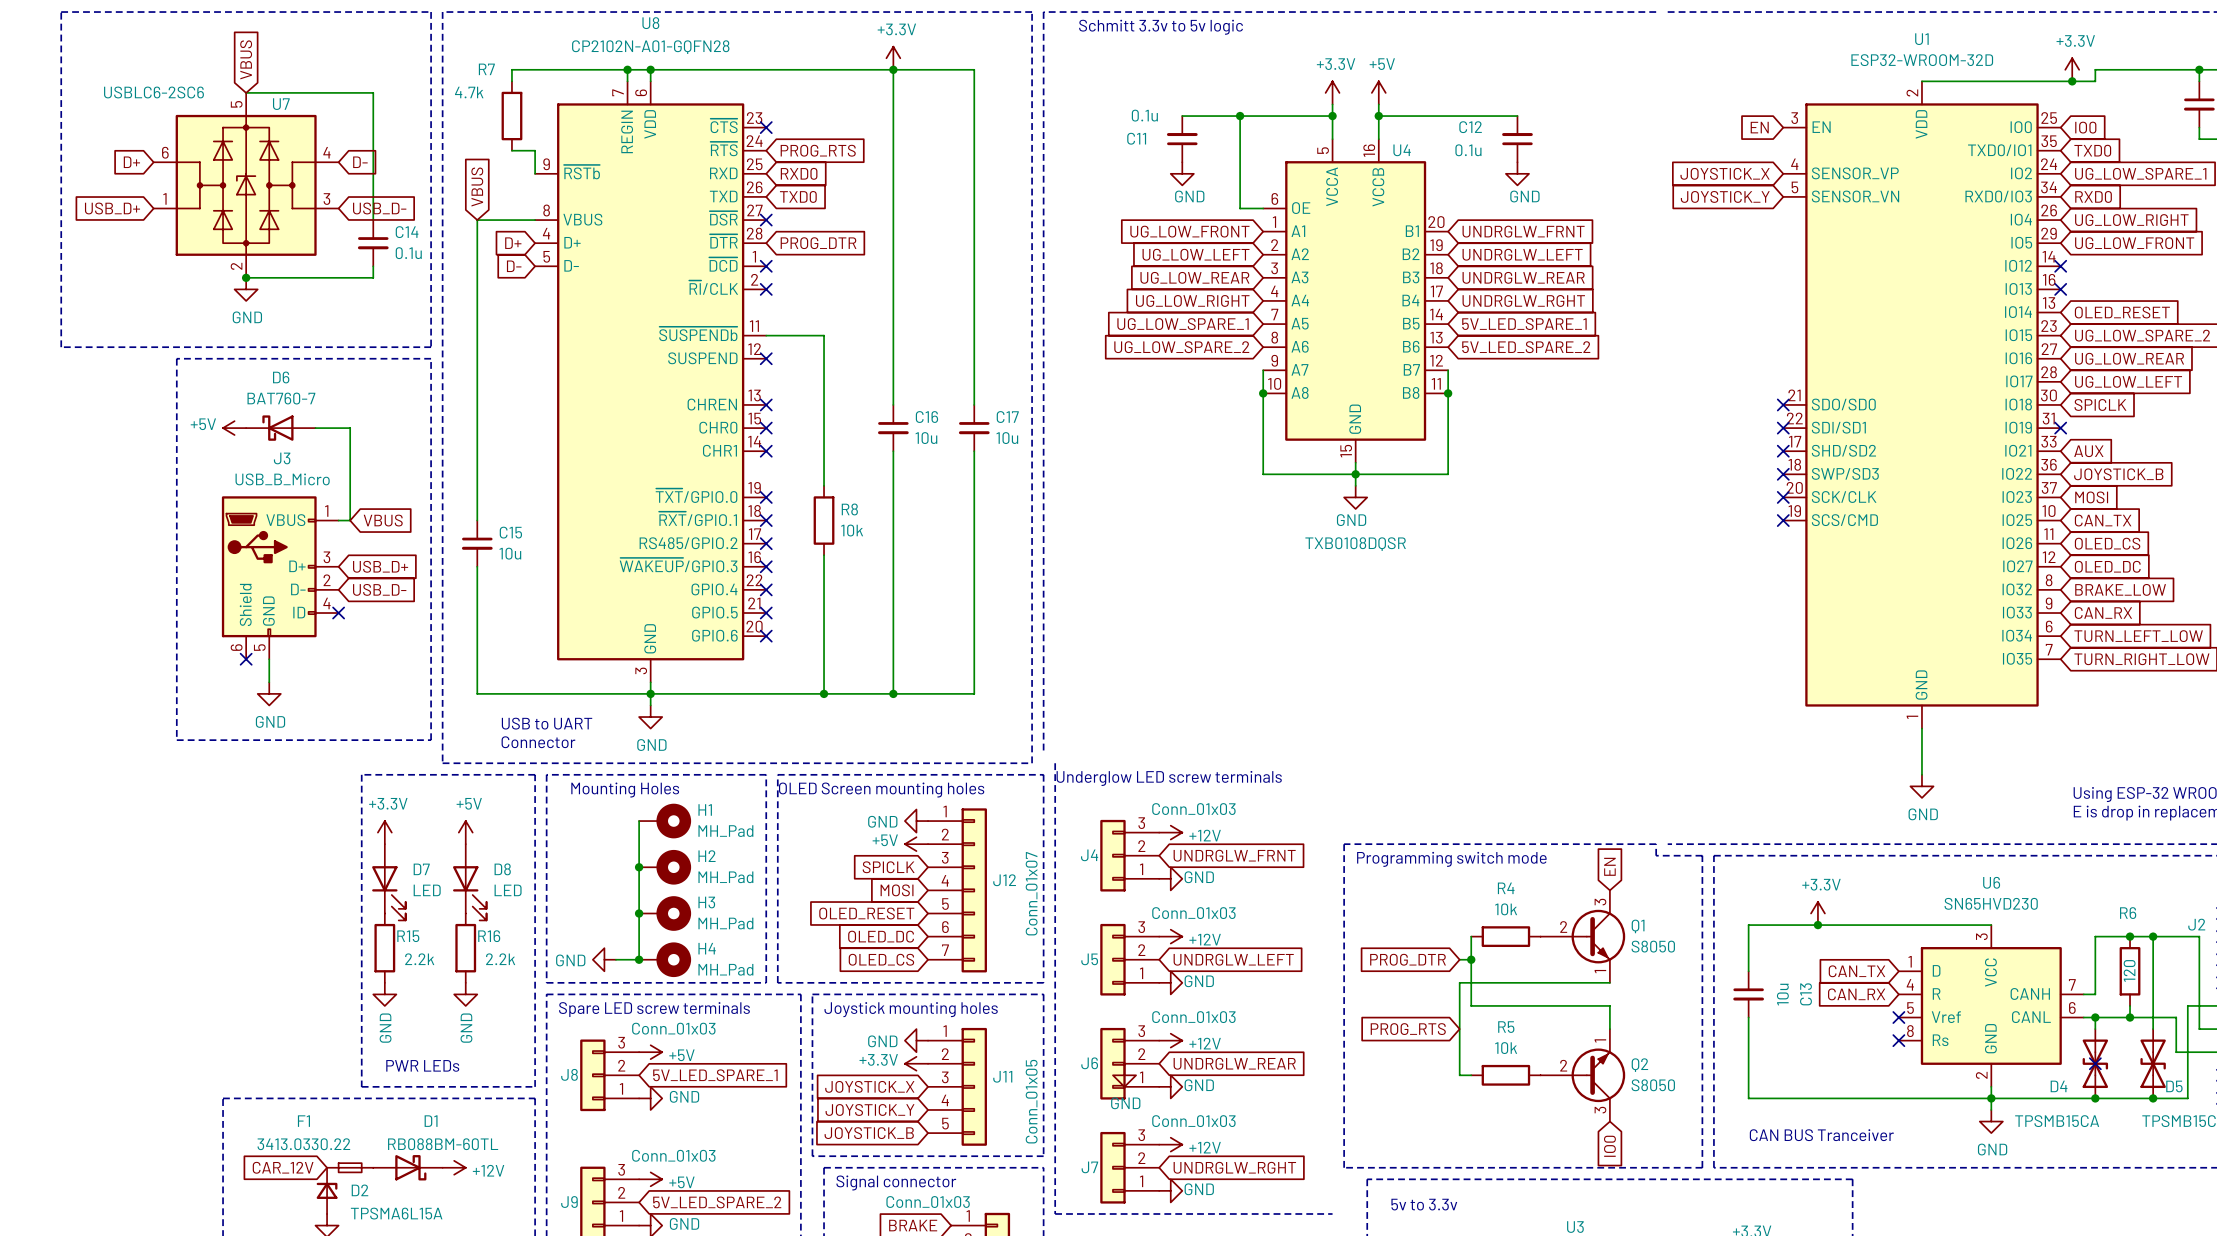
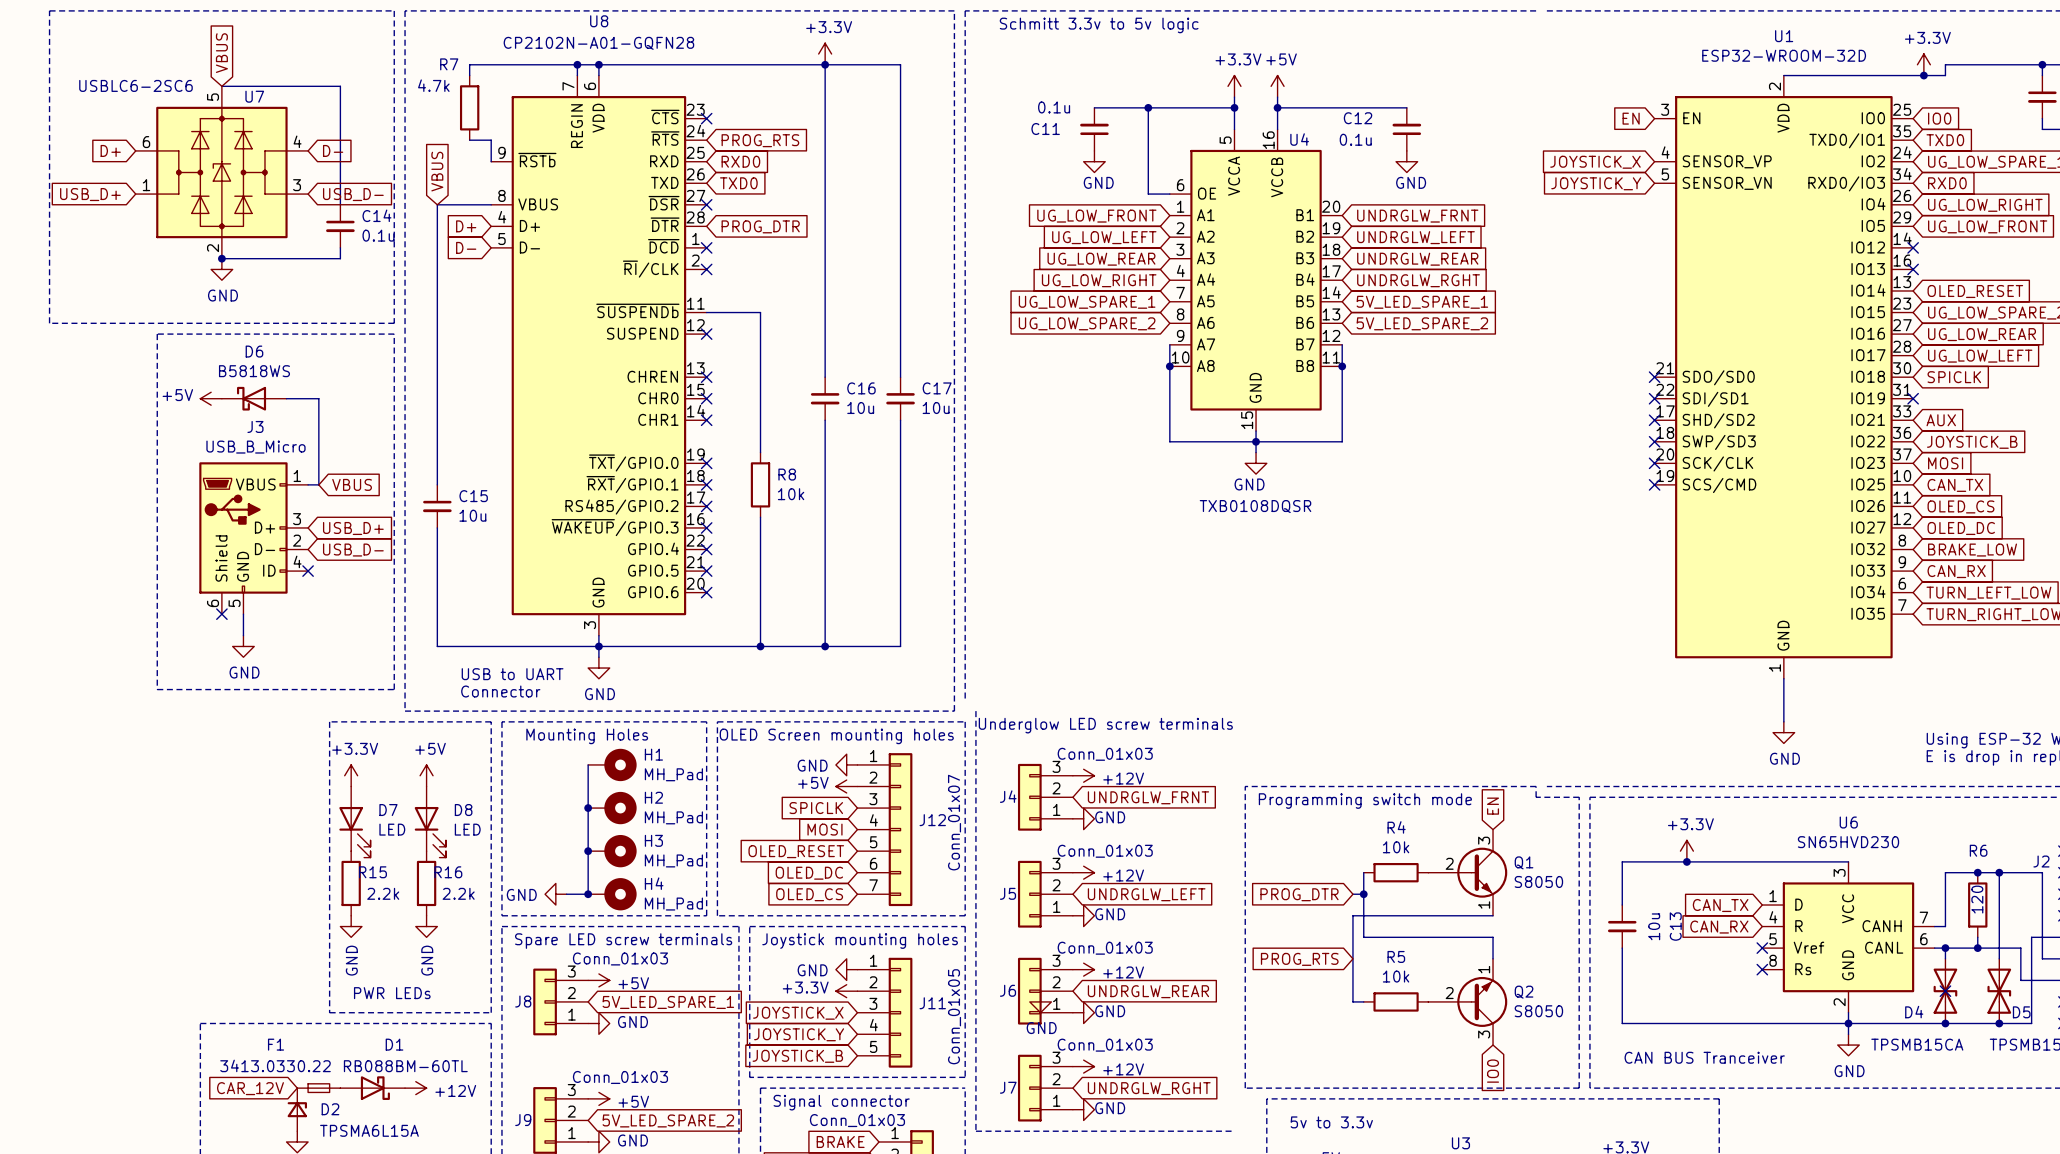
D6 value: BAT760-7 (281, 398) -> B5818WS (254, 371)

